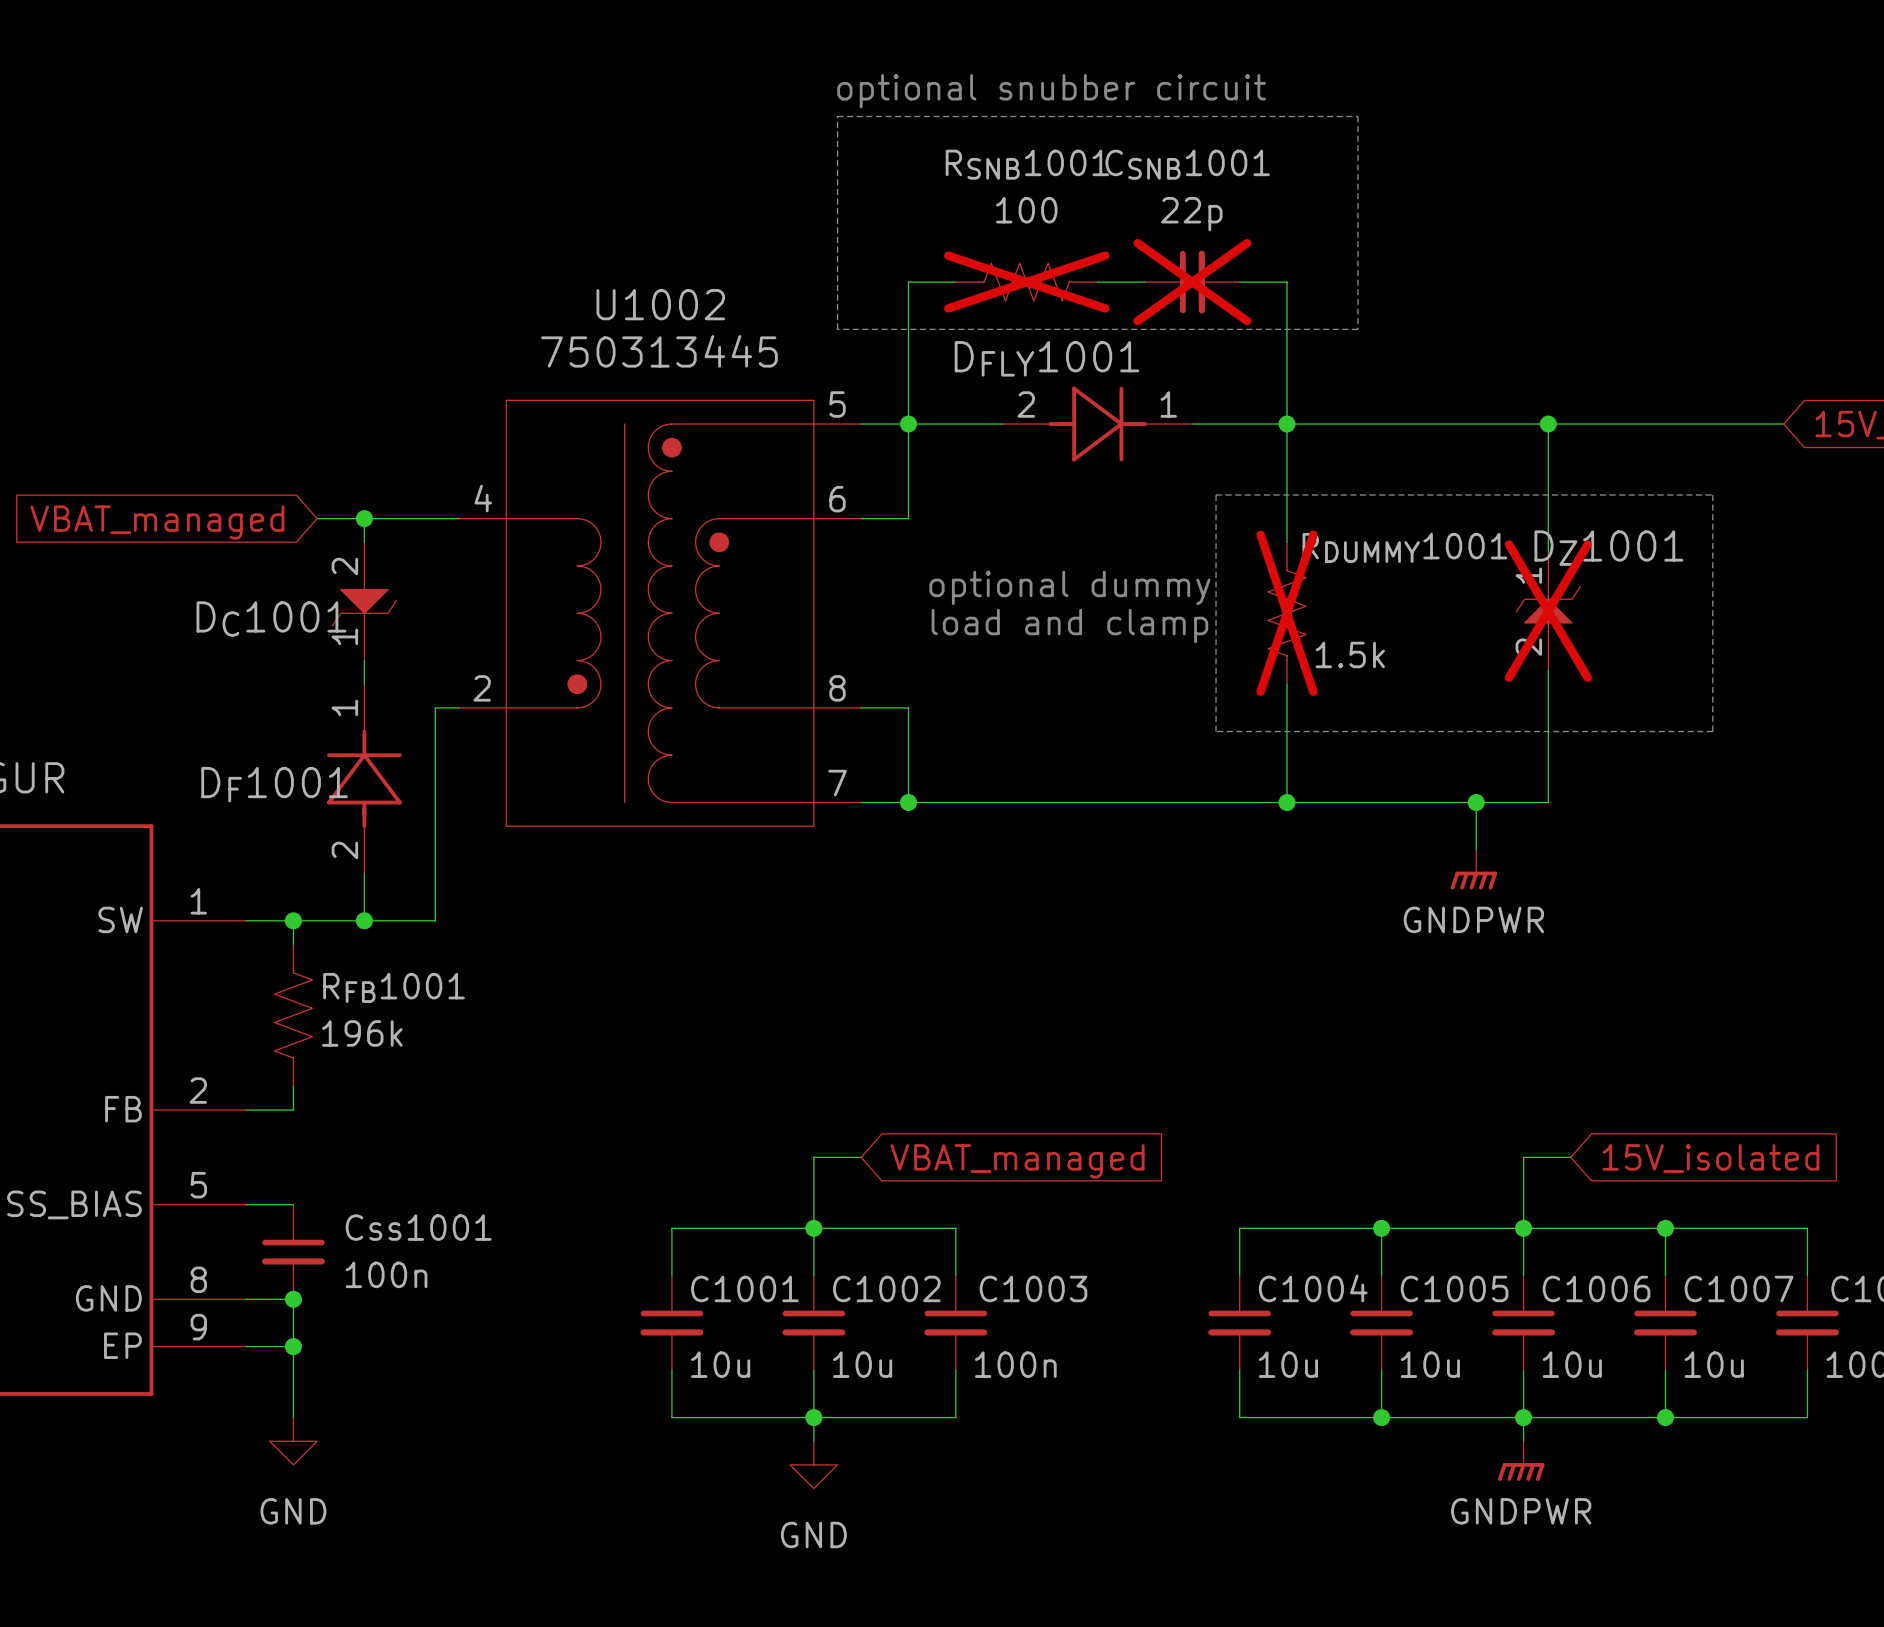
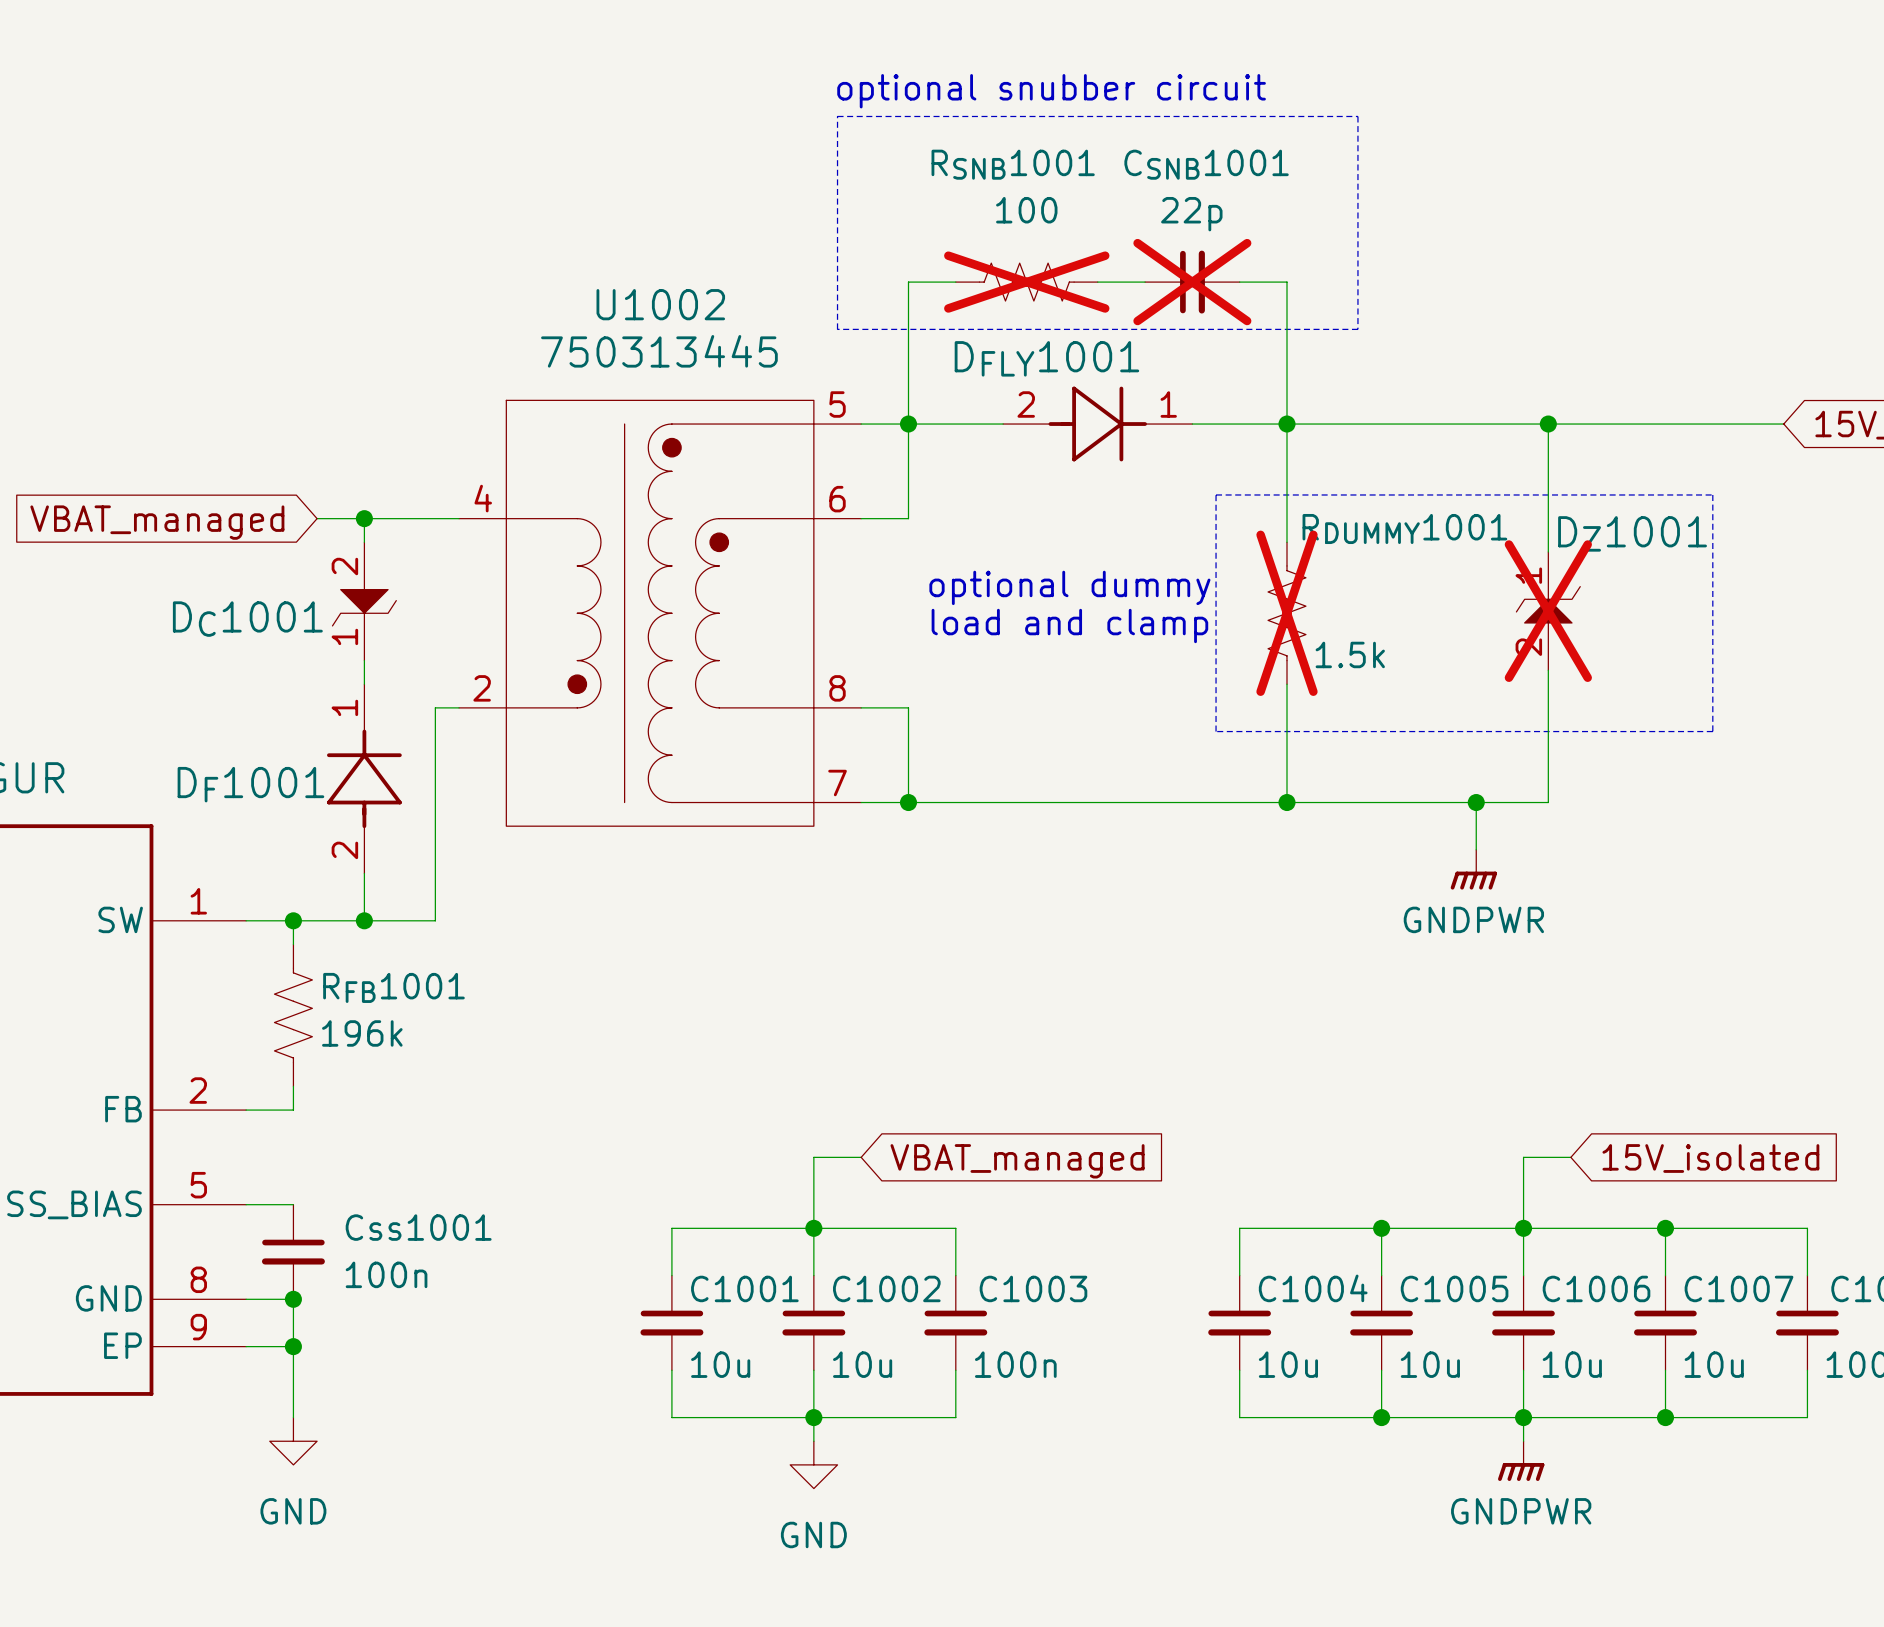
RSNB1001 name position: RSNB1001 (1027, 164) -> RSNB1001 (1013, 164)
CSNB1001 name position: CSNB1001 (1187, 164) -> CSNB1001 (1206, 164)
RDUMMY1001 name position: RDUMMY1001 (1404, 547) -> RDUMMY1001 (1404, 529)
DZ1001 name position: DZ1001 (1608, 548) -> DZ1001 (1632, 533)
DC1001 name position: DC1001 (271, 619) -> DC1001 (247, 619)
DF1001 name position: DF1001 (274, 784) -> DF1001 (250, 784)

